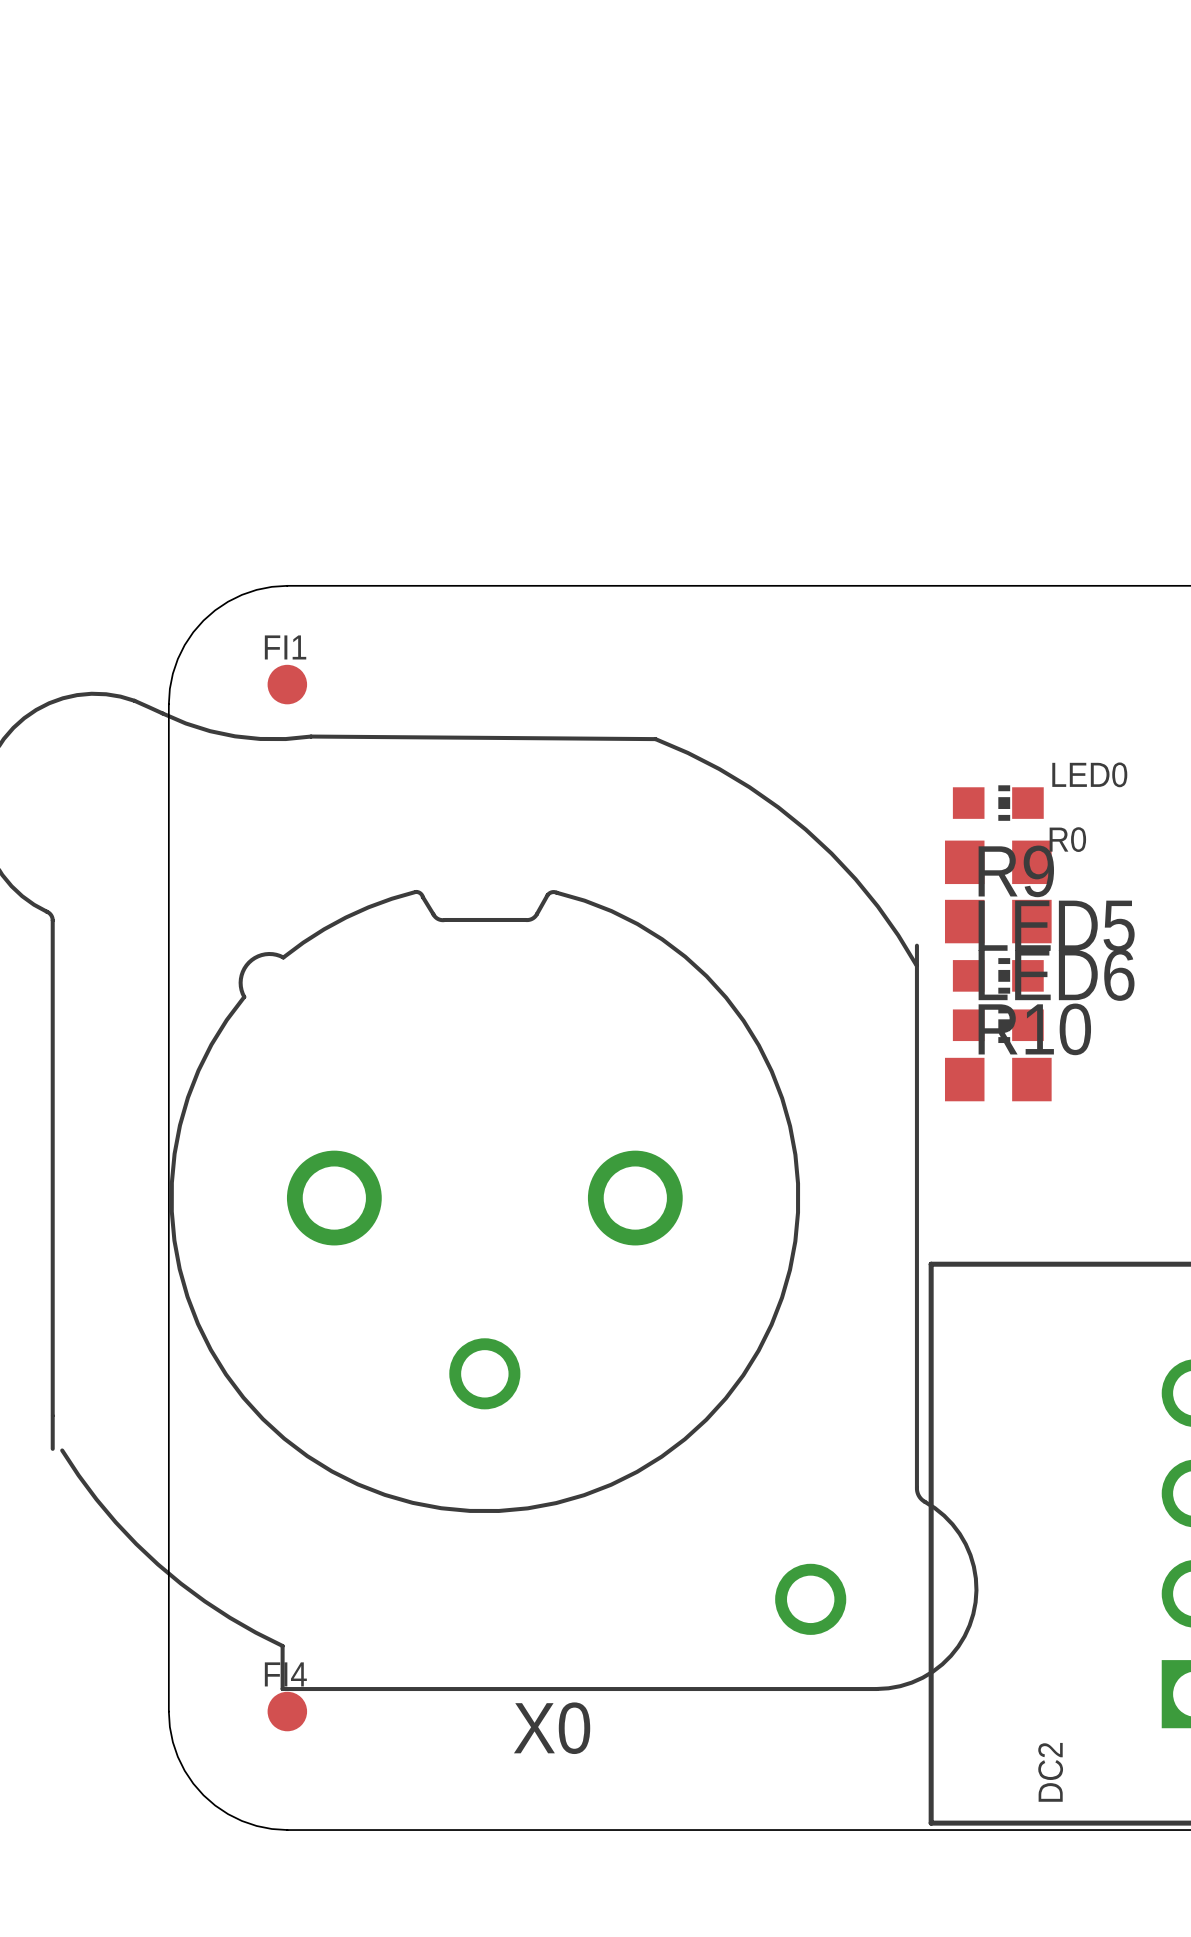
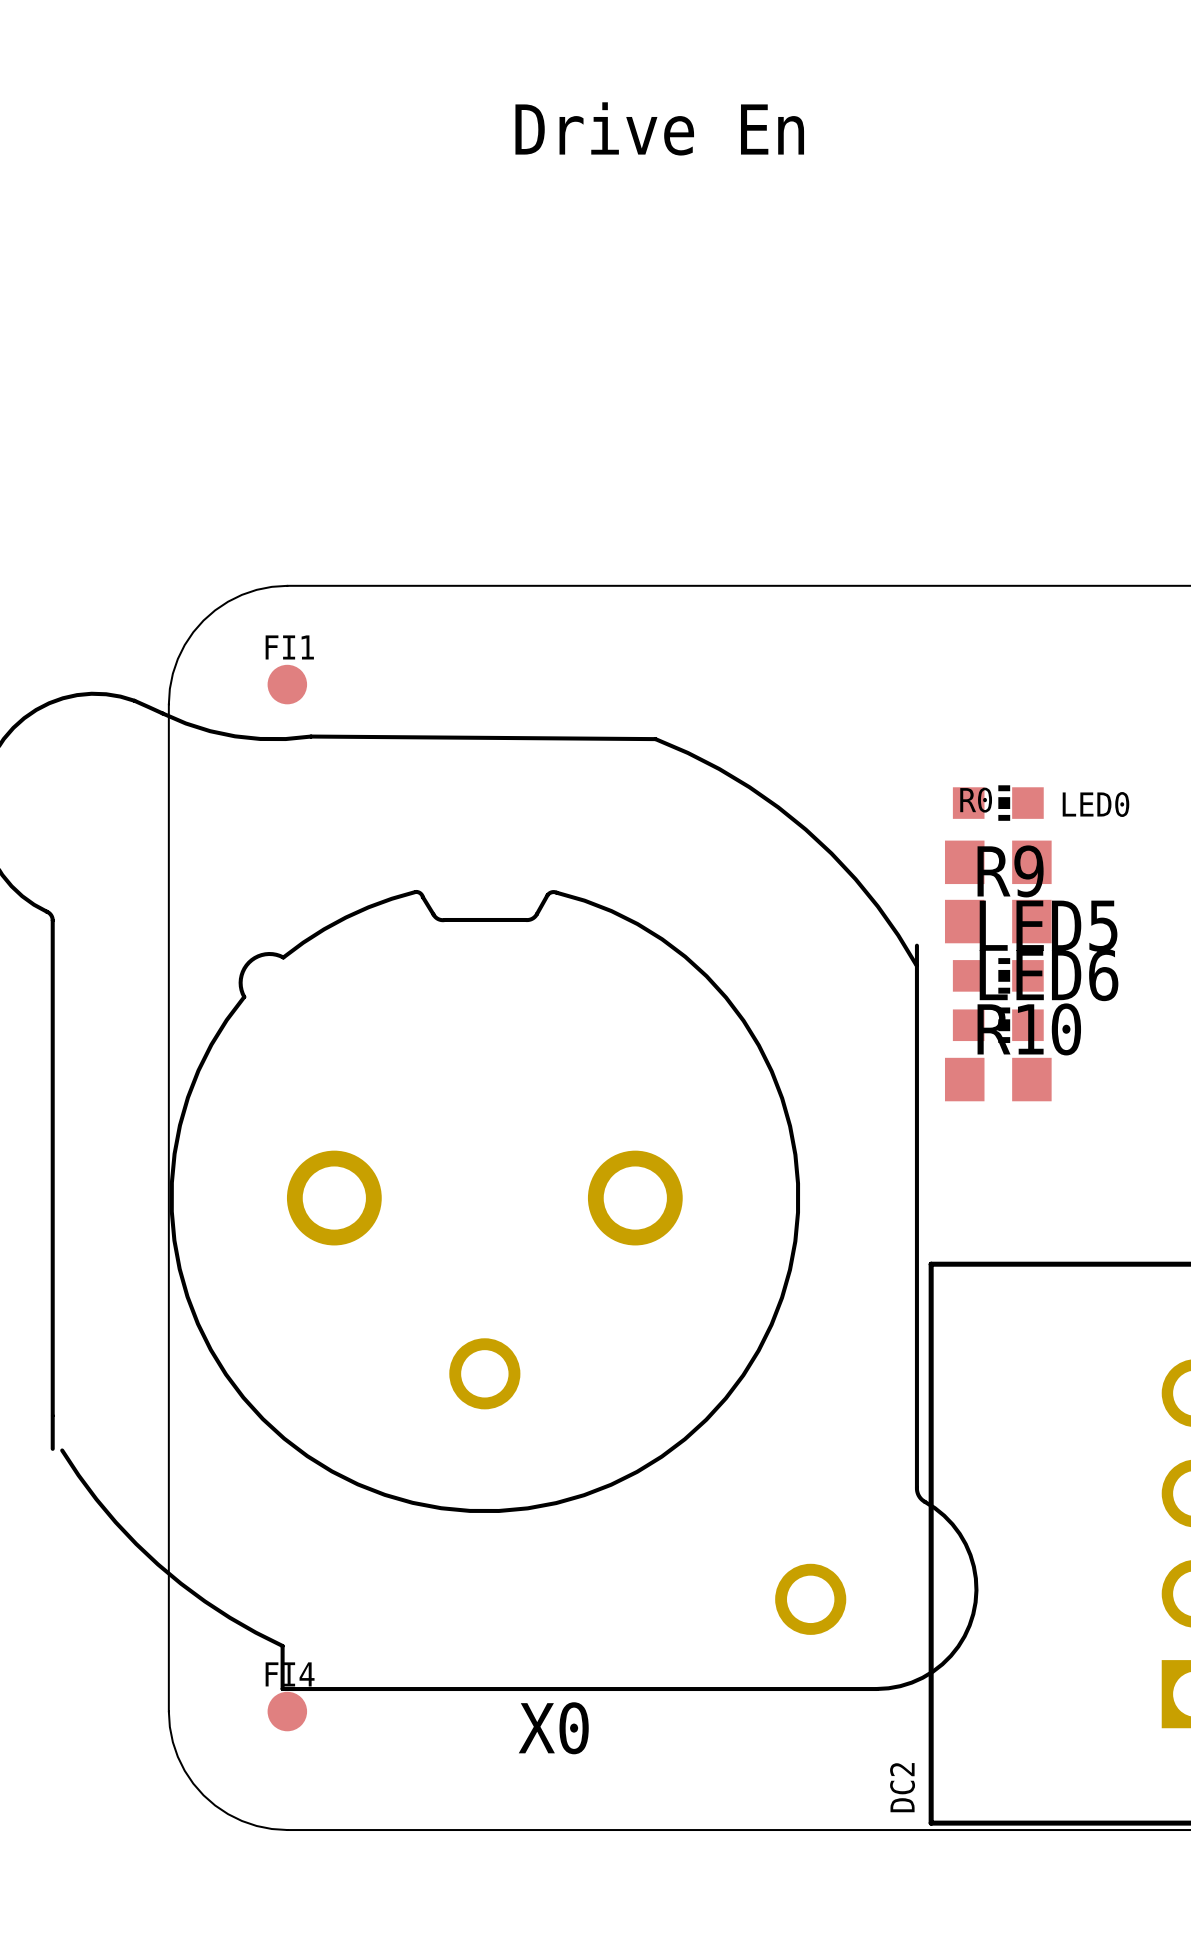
text: none -> Drive En (659, 128)
LED0 name position: LED0 (1089, 774) -> LED0 (1095, 804)
R0 name position: R0 (1067, 839) -> R0 (976, 800)
DC2 name position: DC2 (1050, 1772) -> DC2 (902, 1787)

